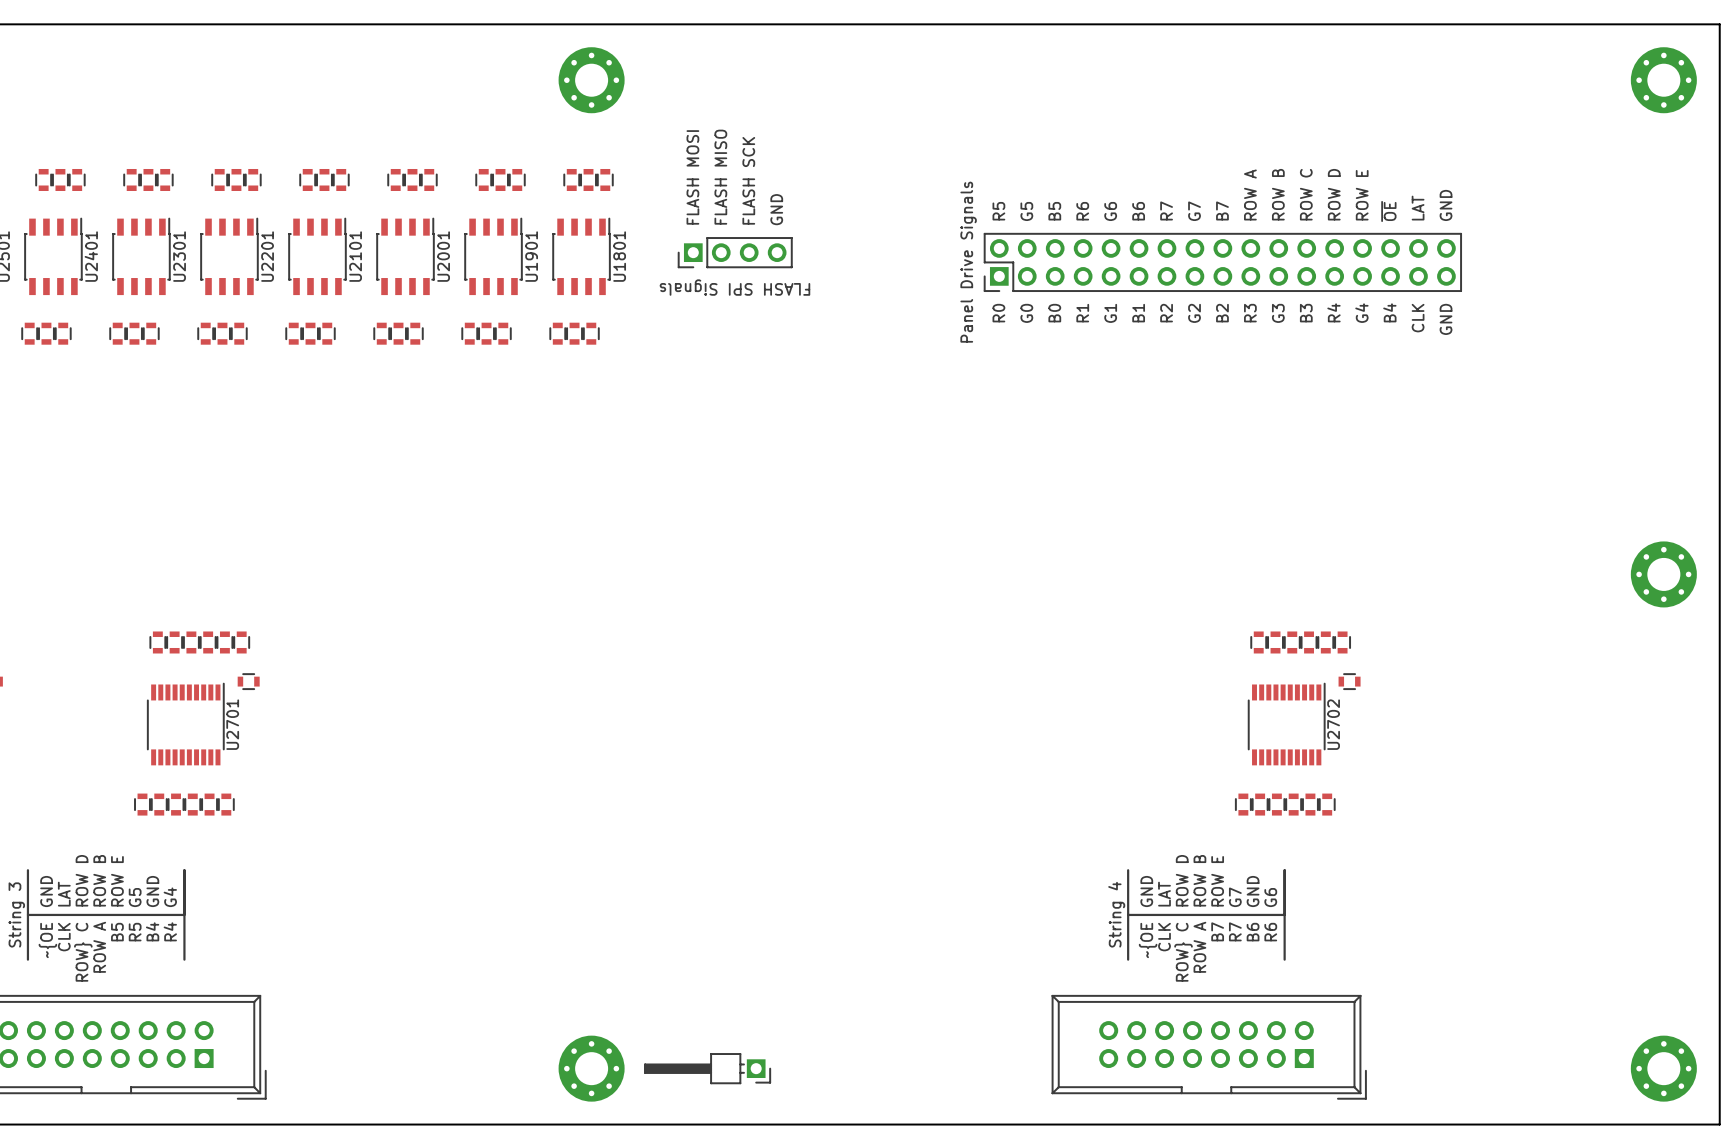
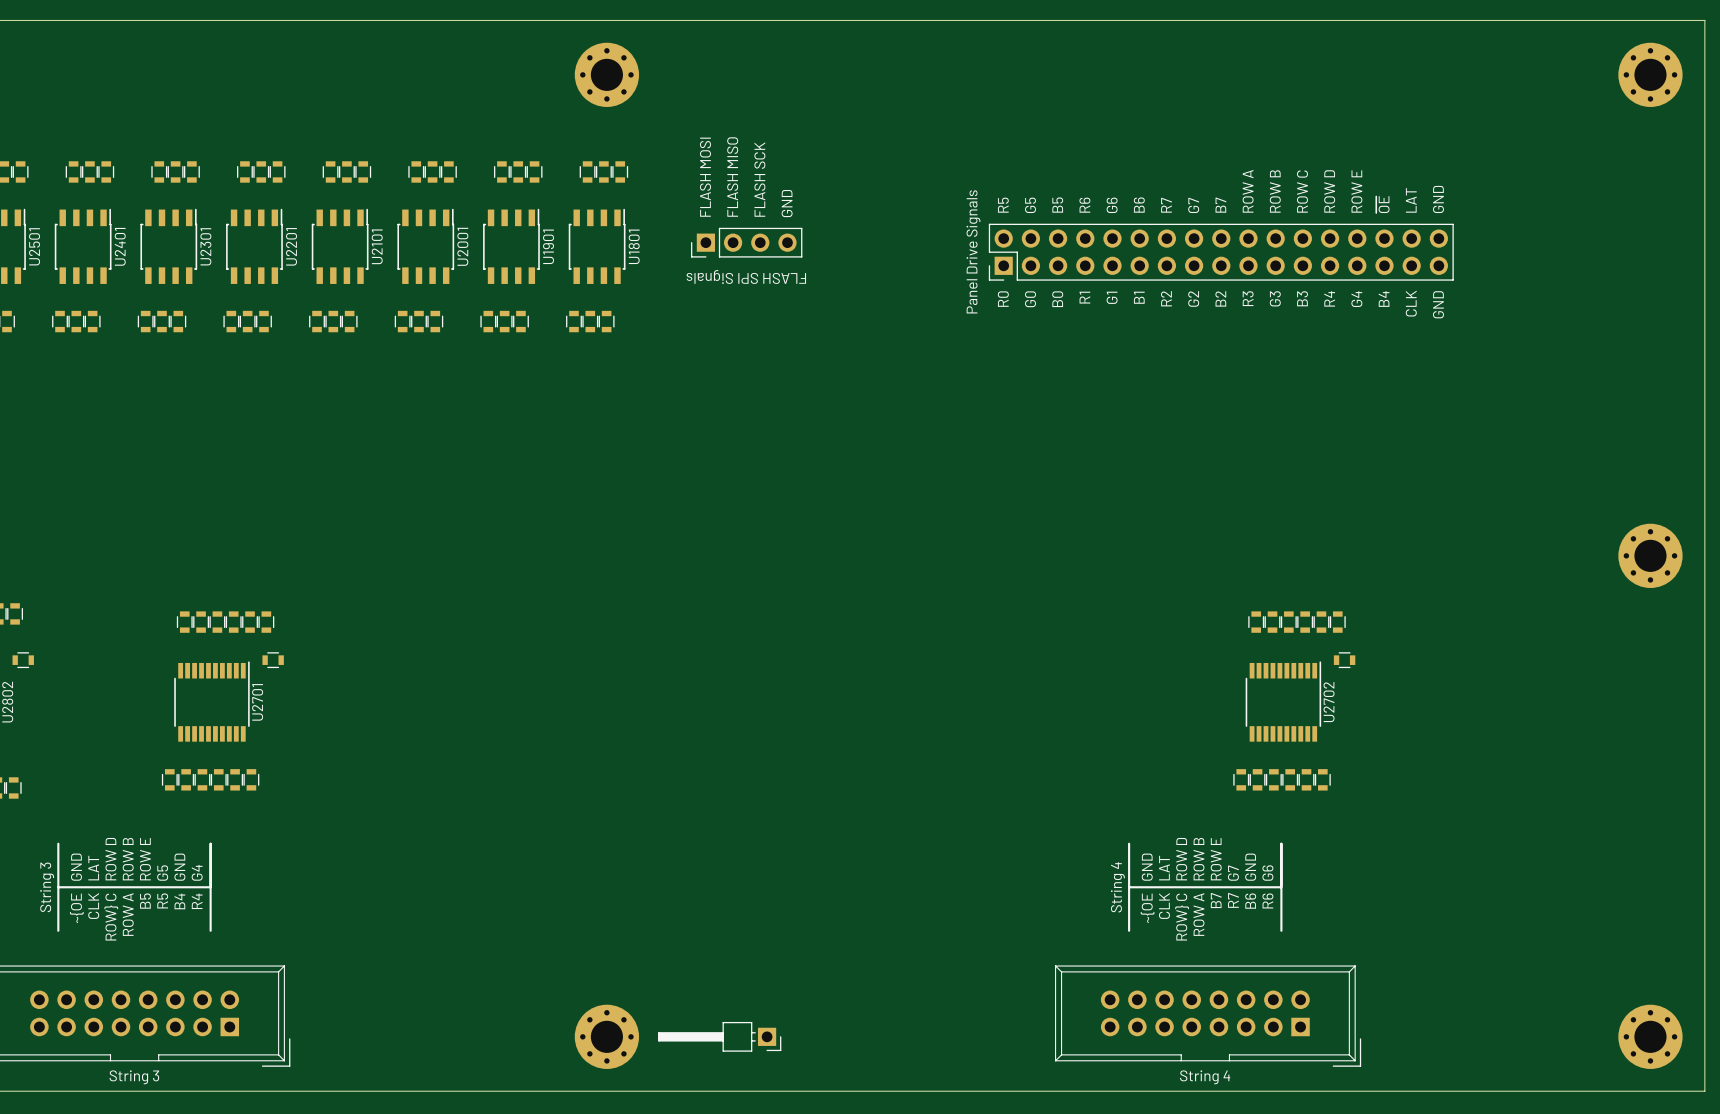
text: none -> String 3 (134, 1077)
text: none -> String 4 (1205, 1077)

